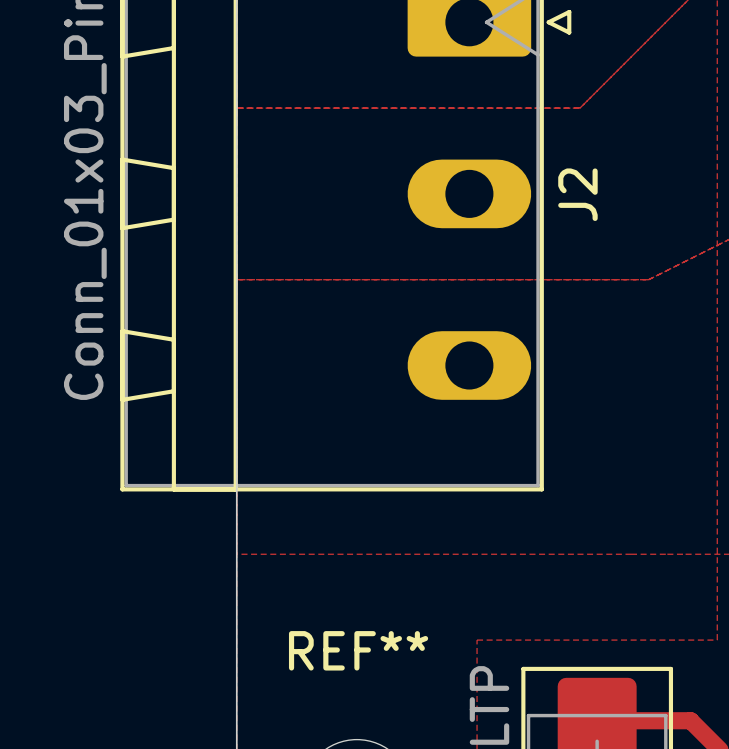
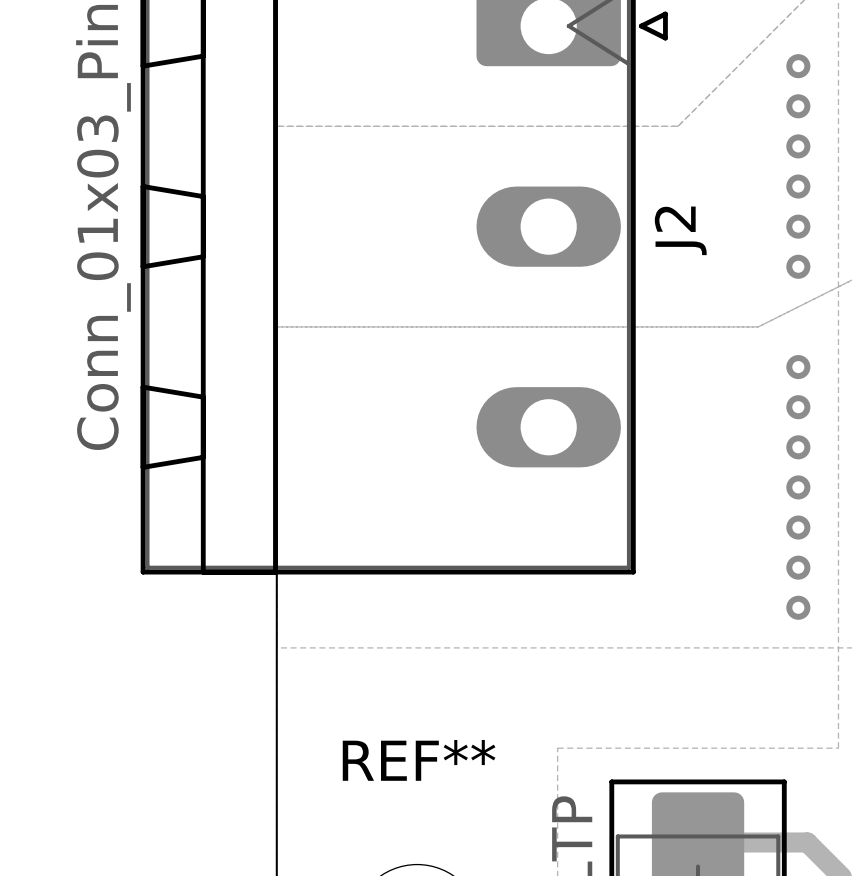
via: none -> (798, 66)
via: none -> (798, 106)
via: none -> (798, 146)
via: none -> (798, 186)
via: none -> (798, 226)
via: none -> (798, 266)
via: none -> (798, 367)
via: none -> (798, 407)
via: none -> (798, 447)
via: none -> (798, 487)
via: none -> (798, 527)
via: none -> (798, 567)
via: none -> (798, 607)

